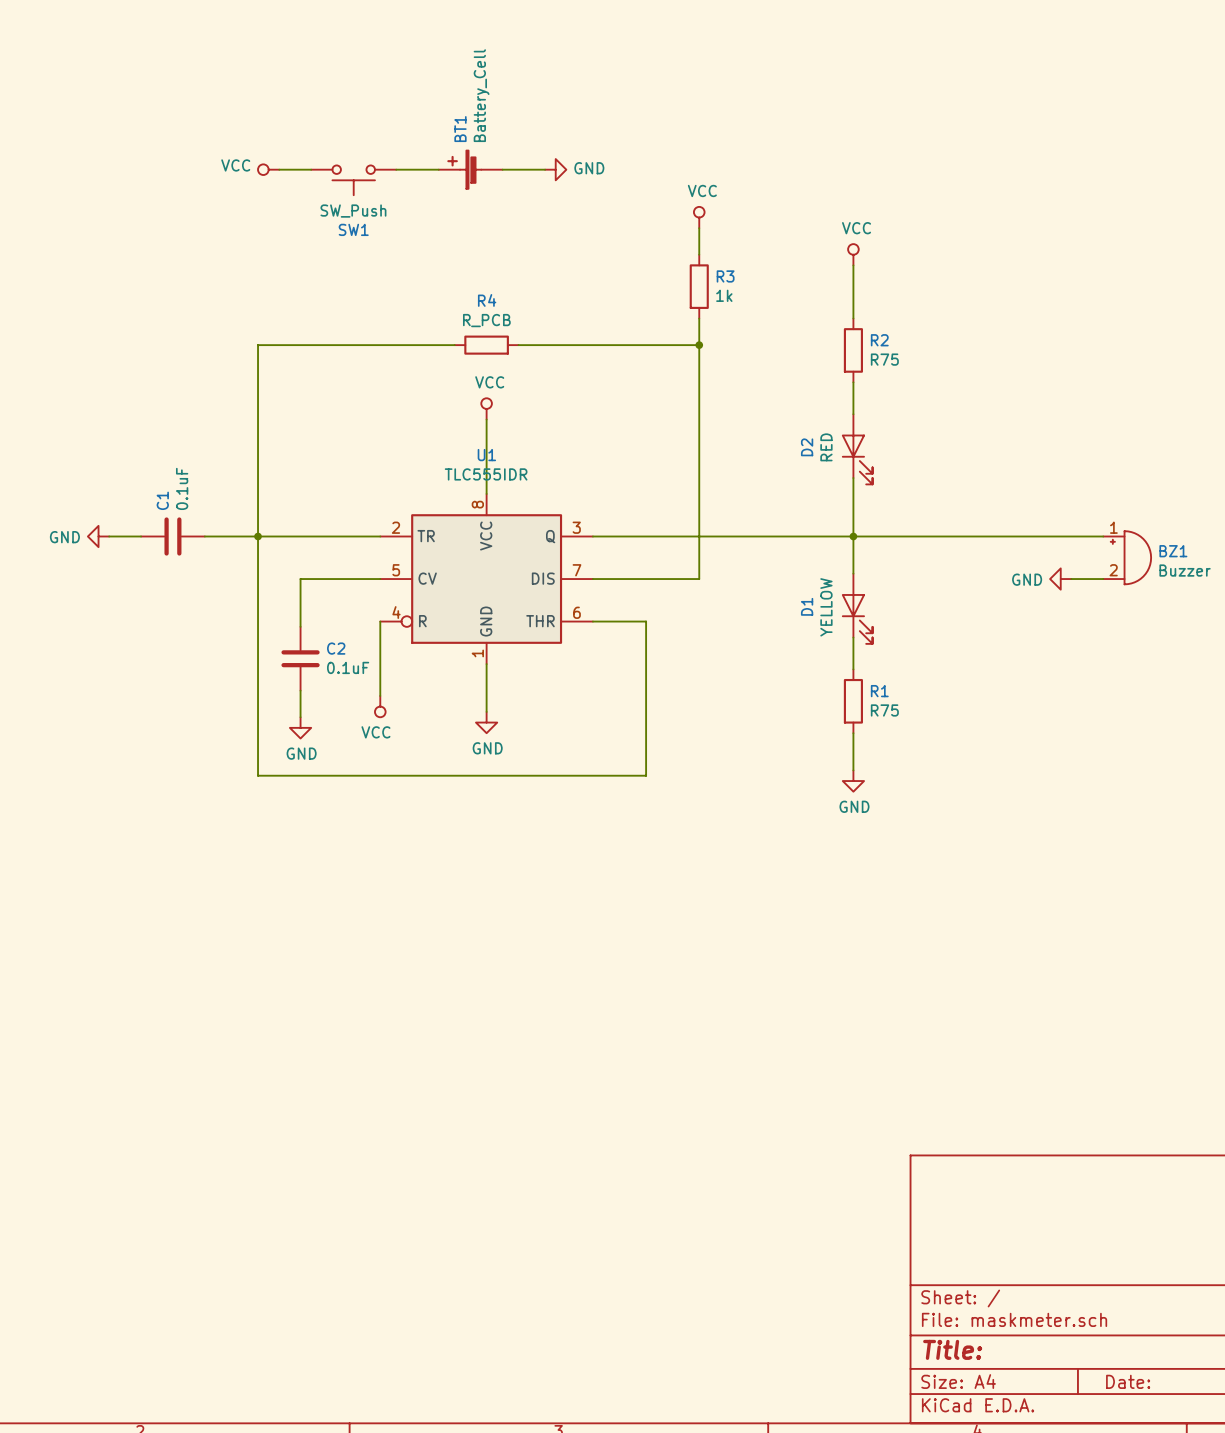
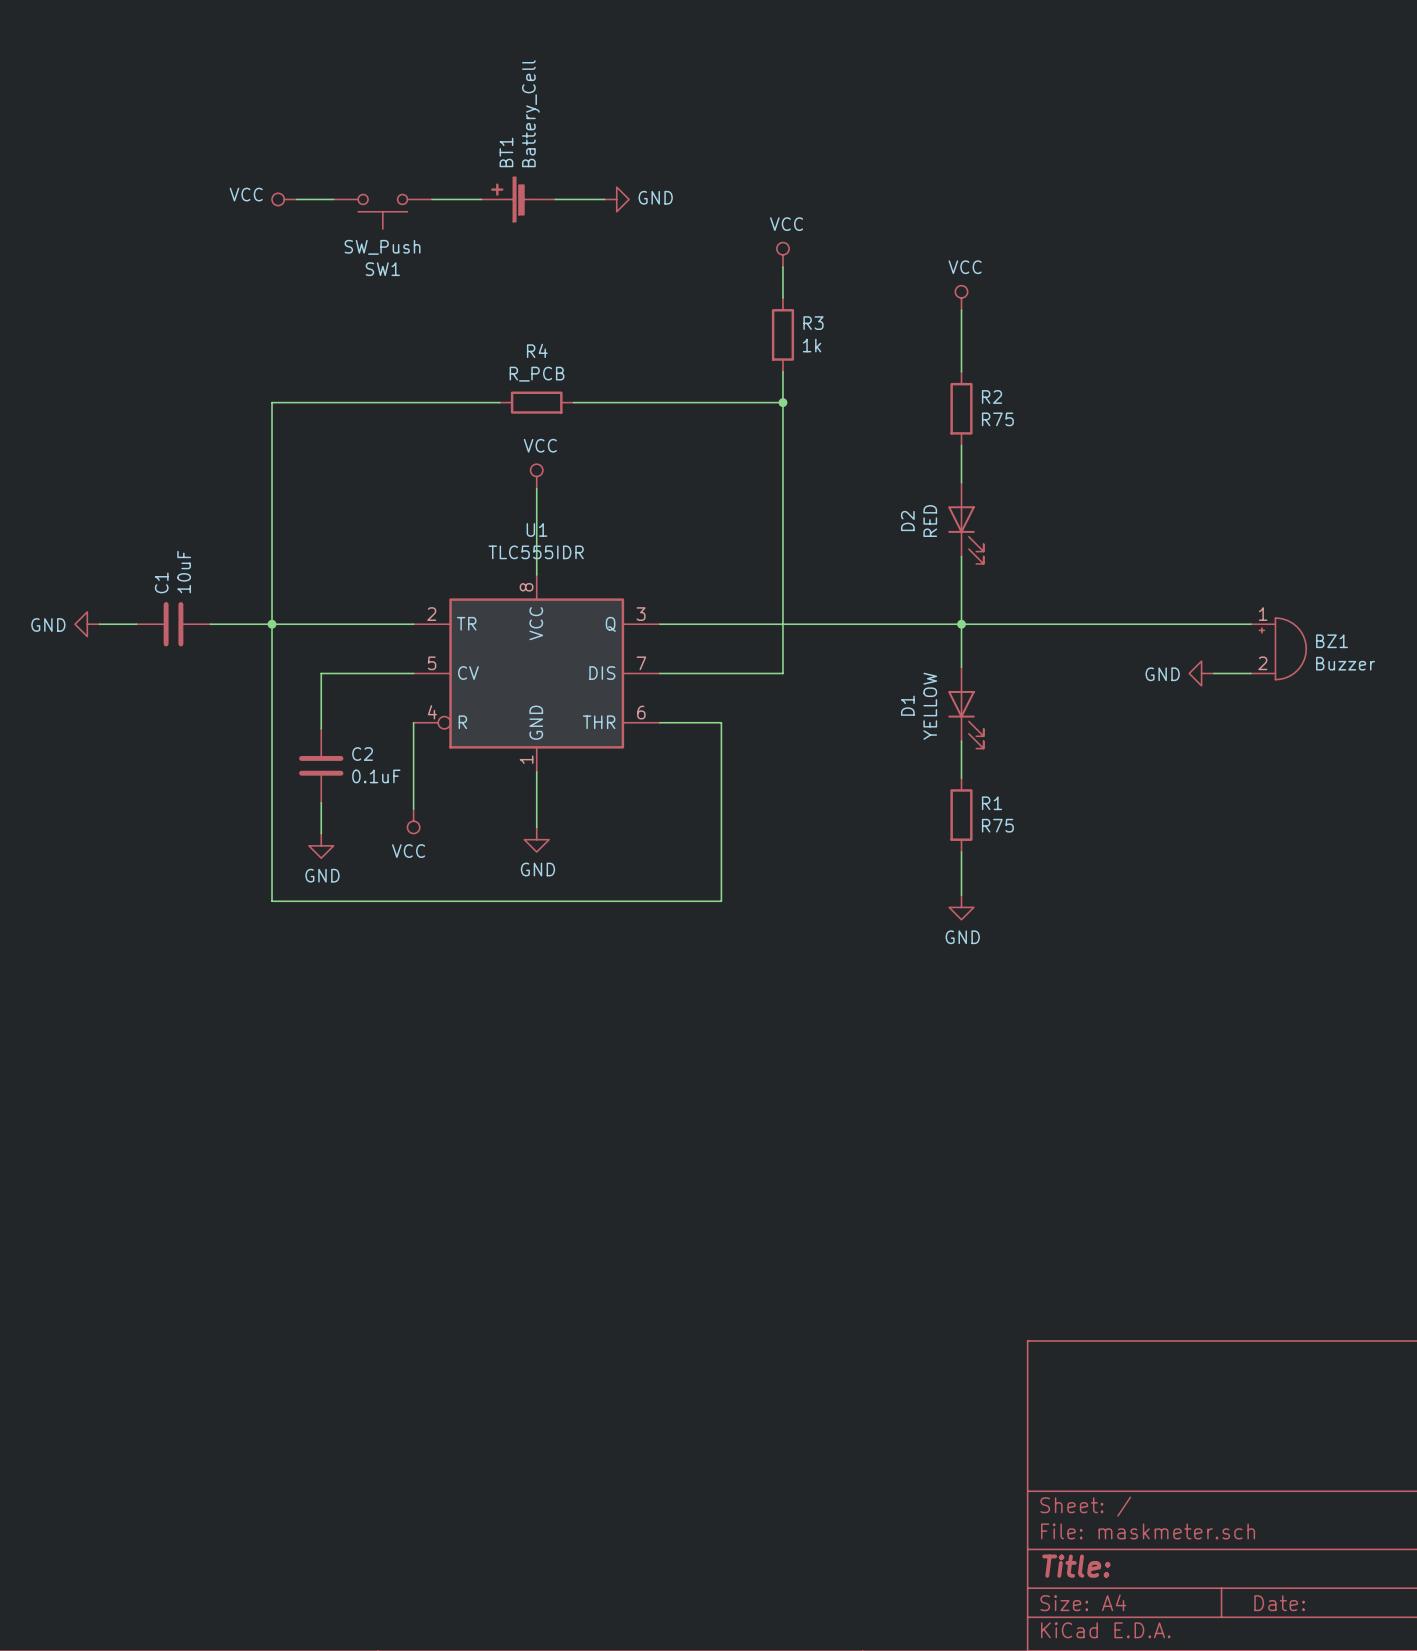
C1 value: 0.1uF (182, 488) -> 10uF (184, 572)

